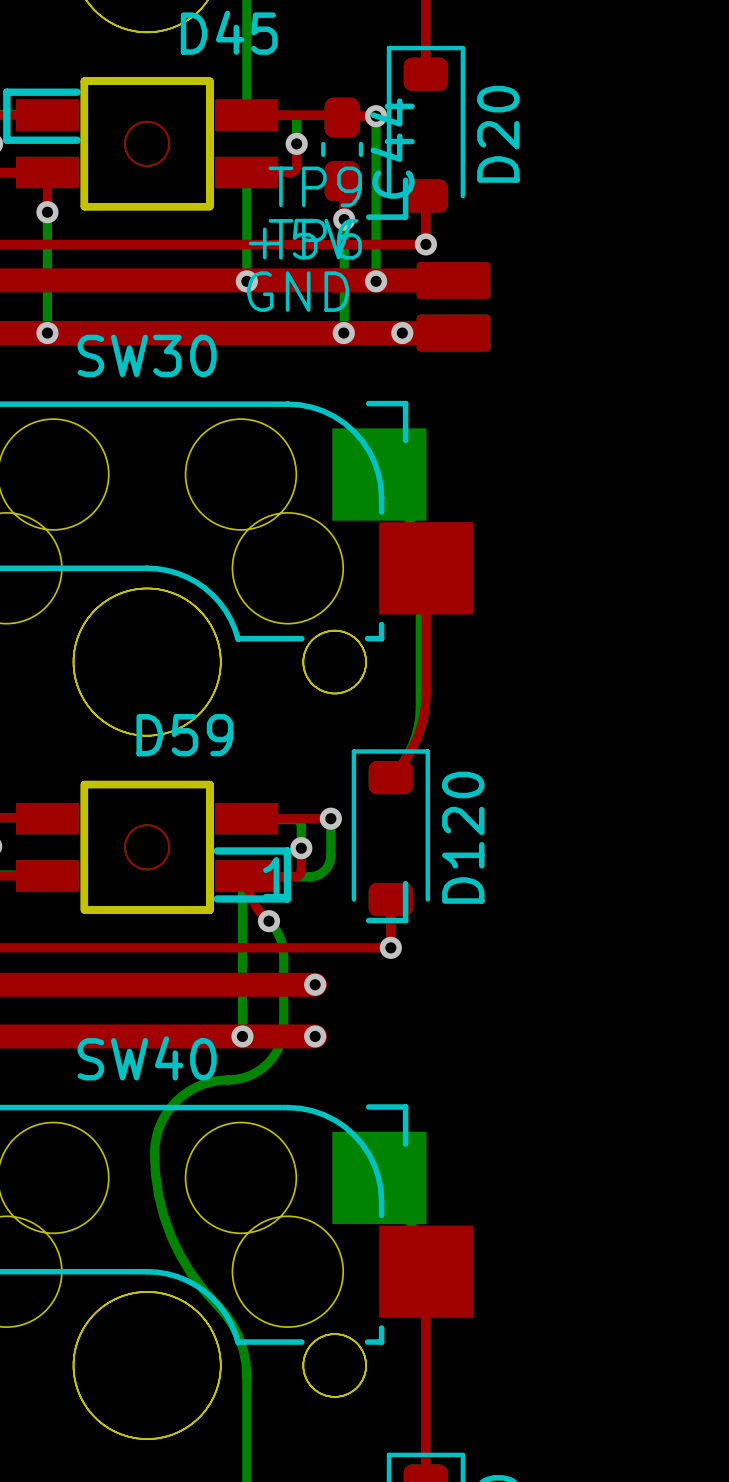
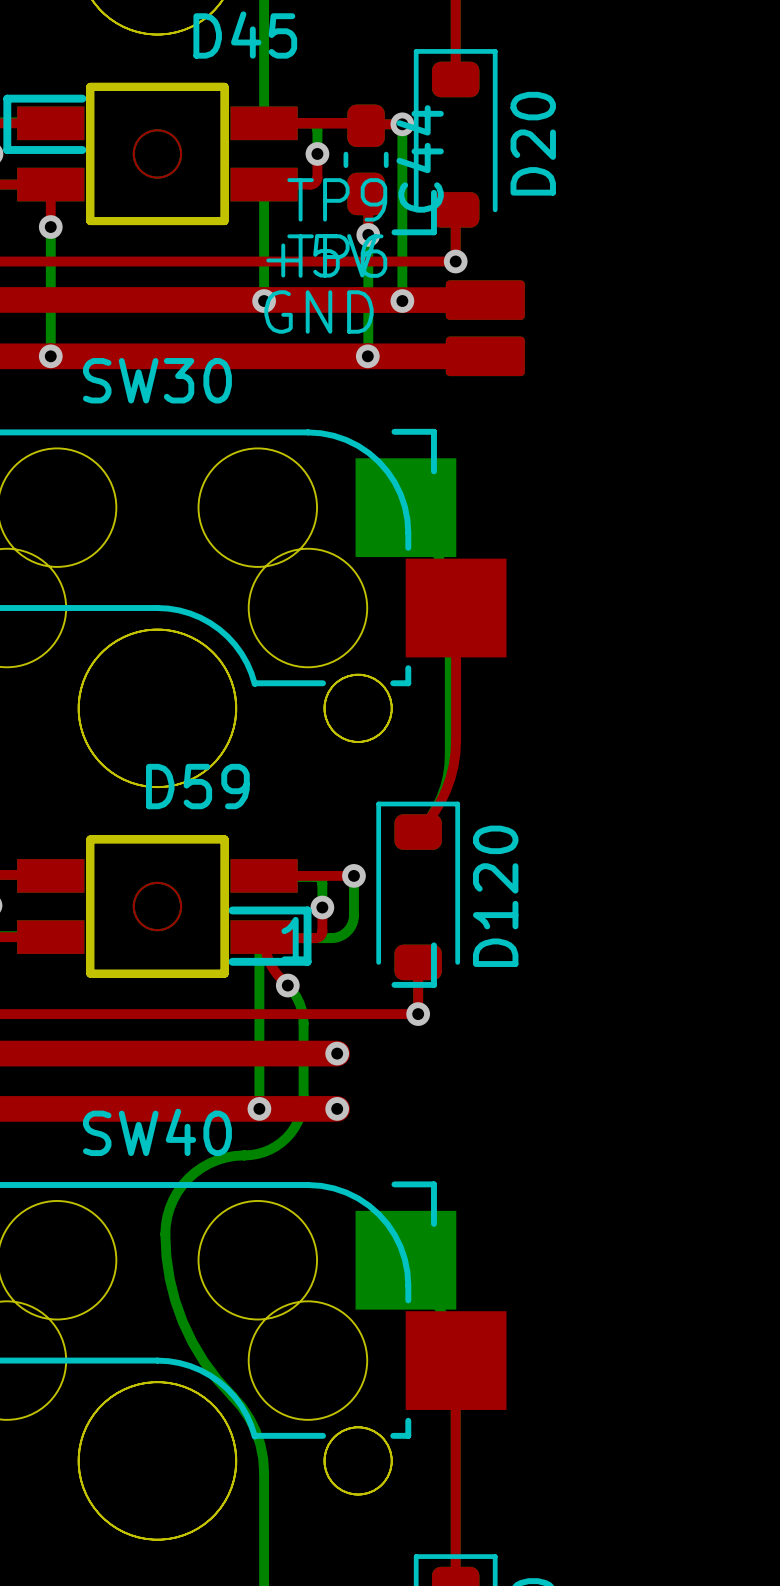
via: (402, 333) -> none

